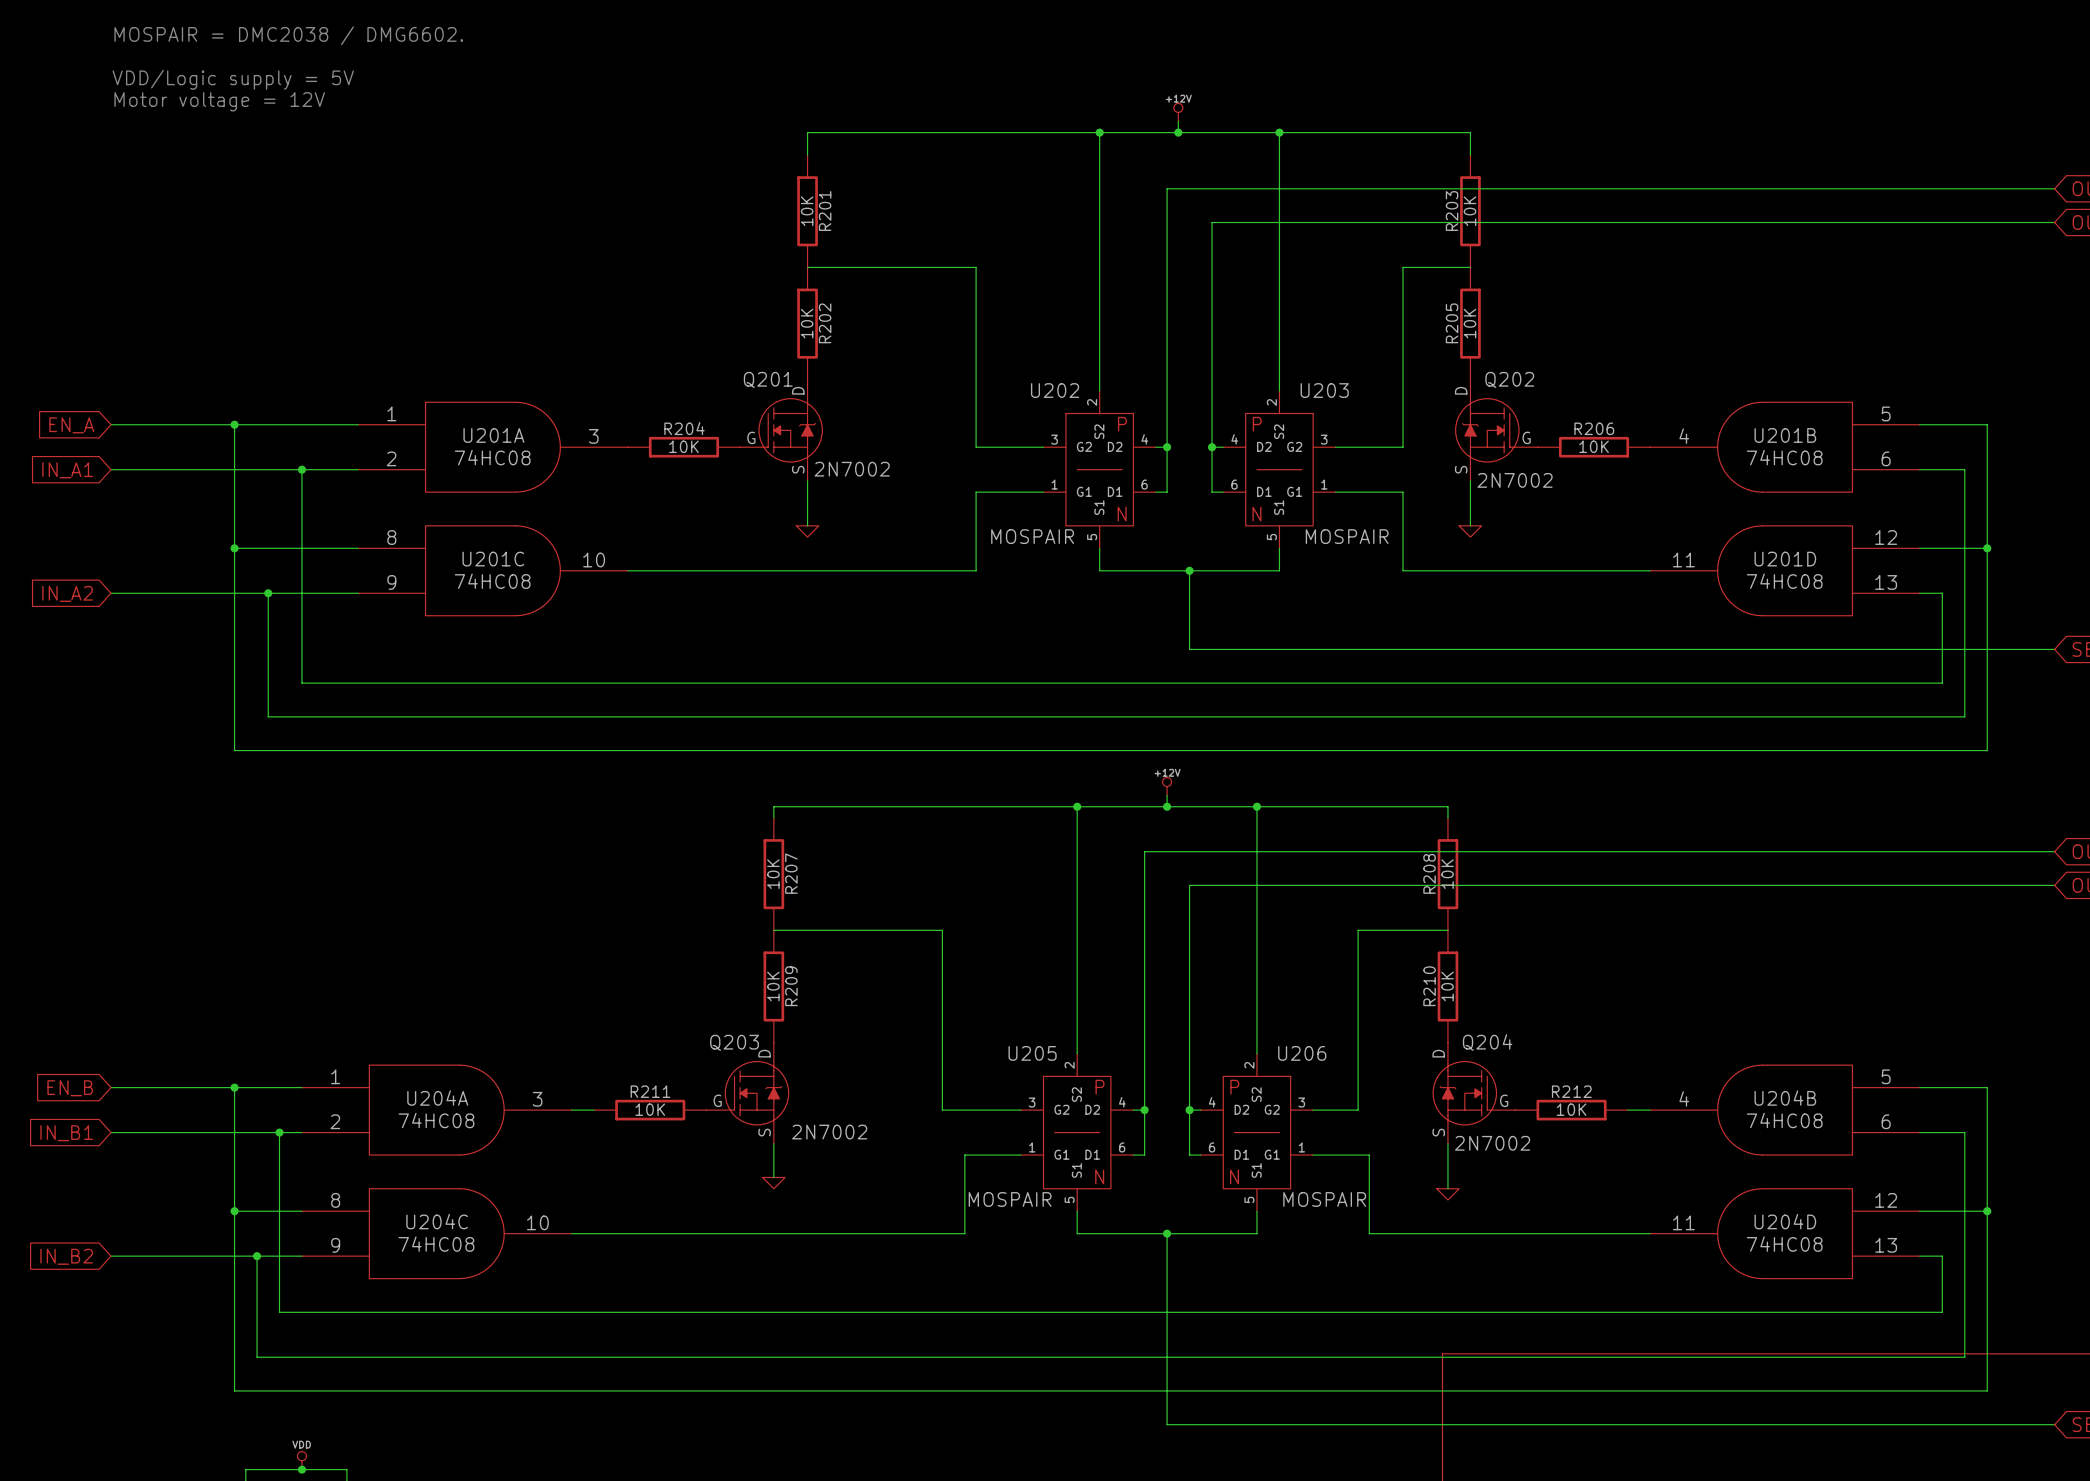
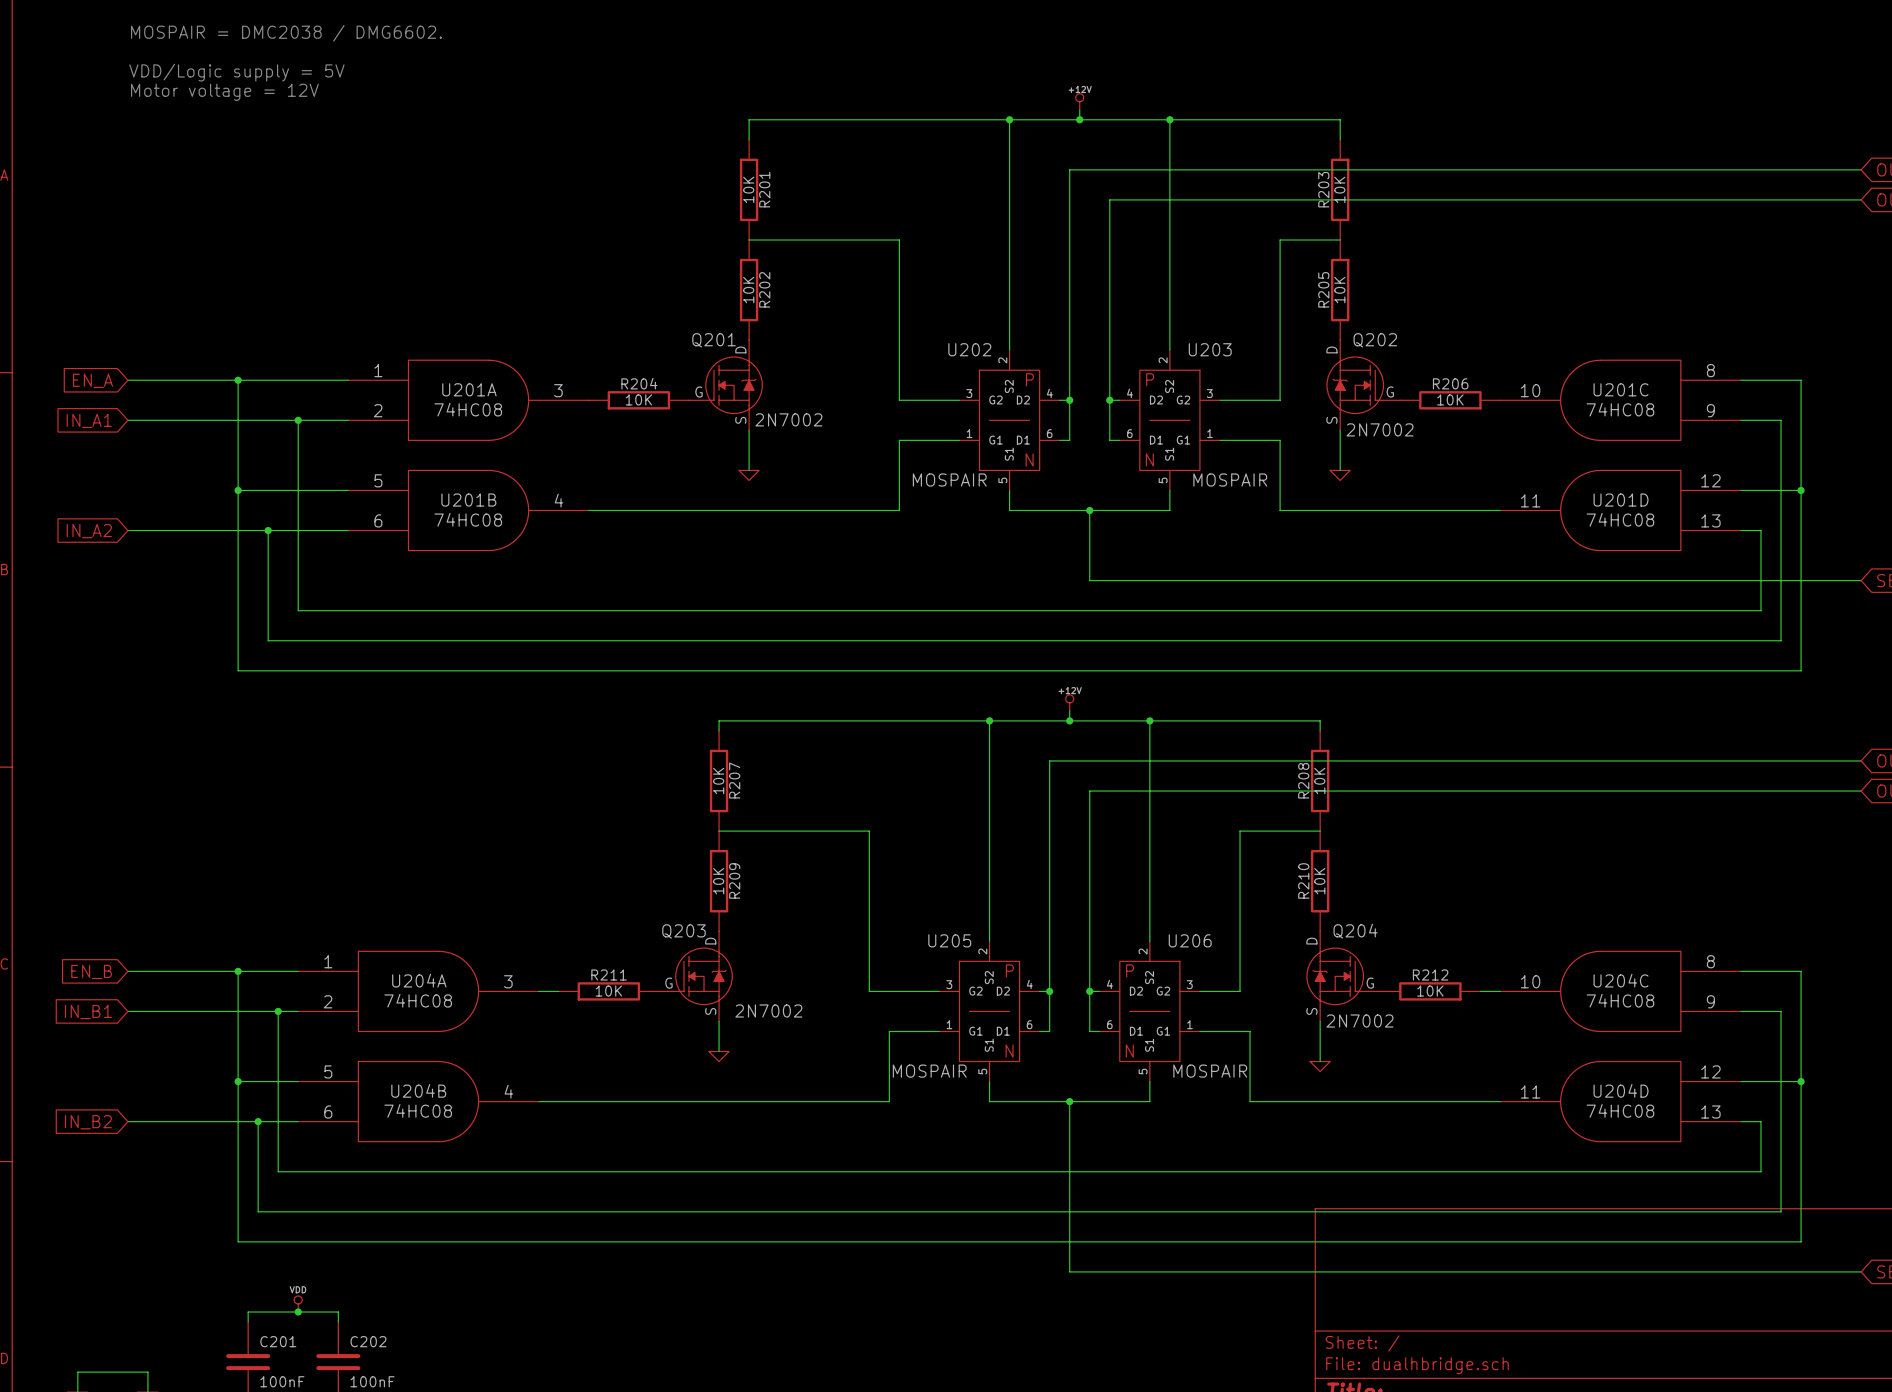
U201B flip: as is (1785, 447) -> left-right (468, 510)
U201B position: (1785, 447) -> (468, 510)
U201C flip: as is (492, 570) -> left-right (1620, 400)
U201C position: (492, 570) -> (1620, 400)
U204B flip: as is (1785, 1110) -> left-right (418, 1101)
U204B position: (1785, 1110) -> (418, 1101)
U204C flip: as is (436, 1233) -> left-right (1620, 991)
U204C position: (436, 1233) -> (1620, 991)

